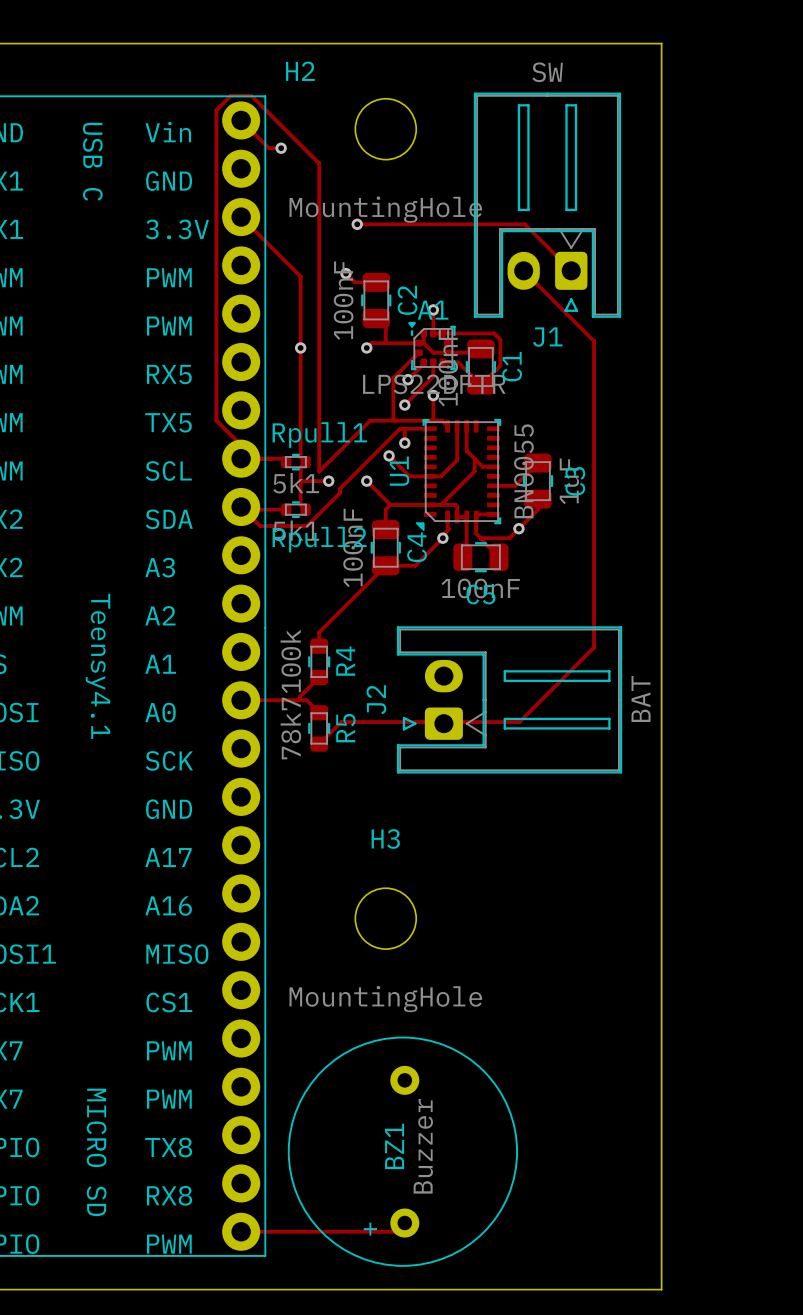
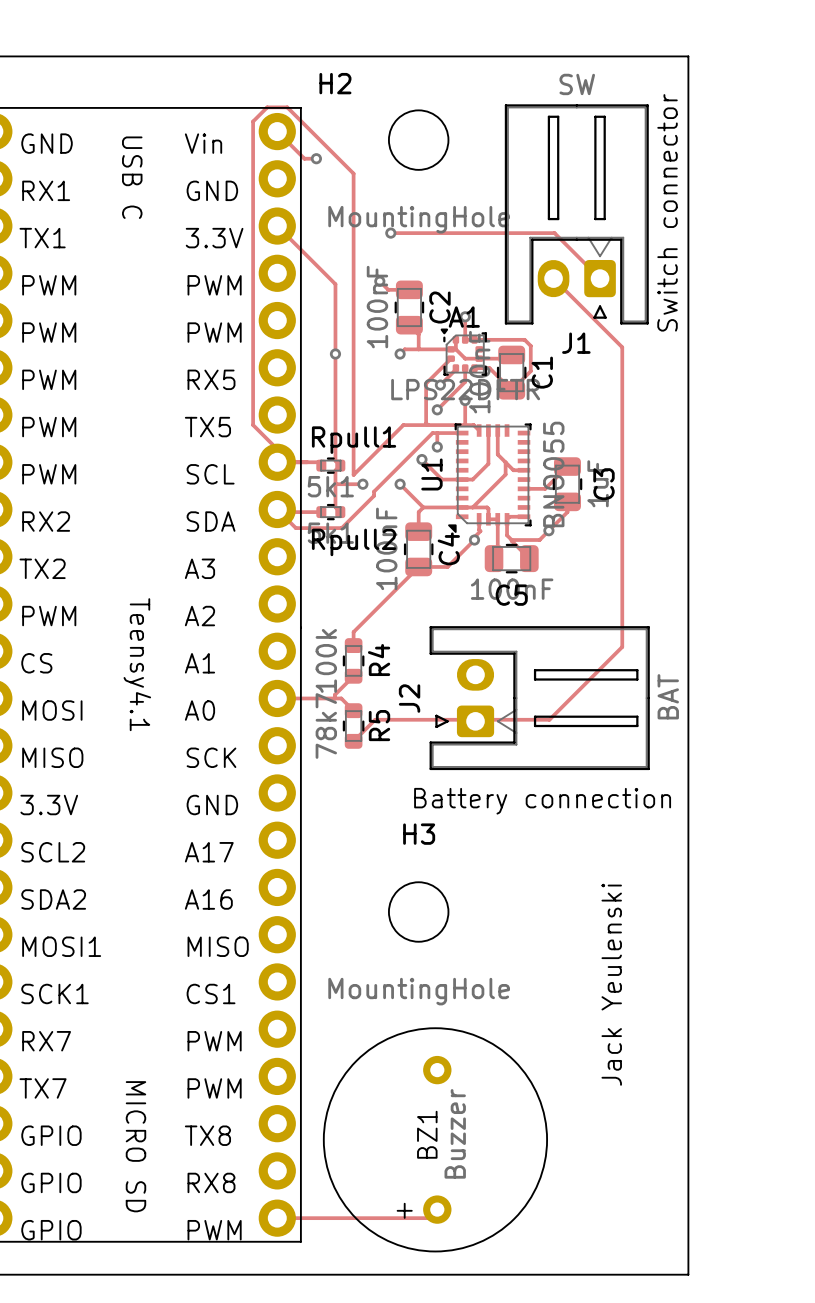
text: none -> Switch connector (667, 212)
text: none -> Battery connection (542, 801)
text: none -> Jack Yeulenski (611, 984)

